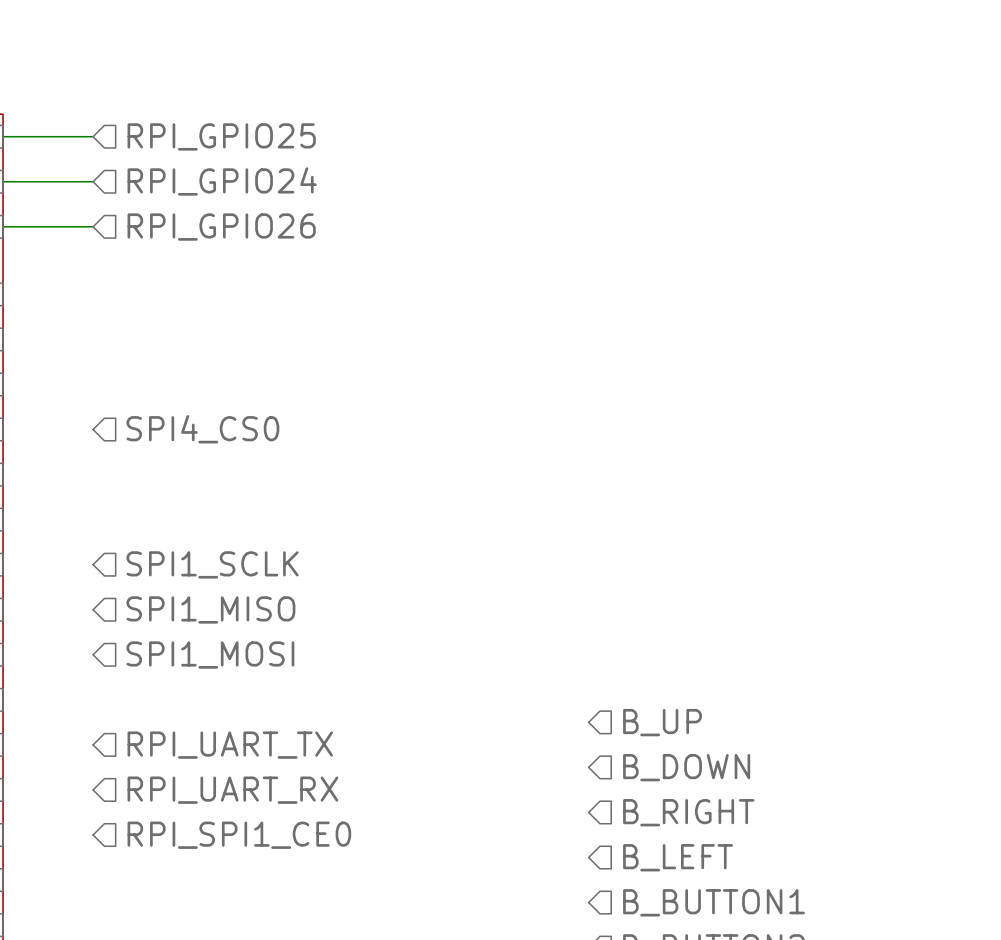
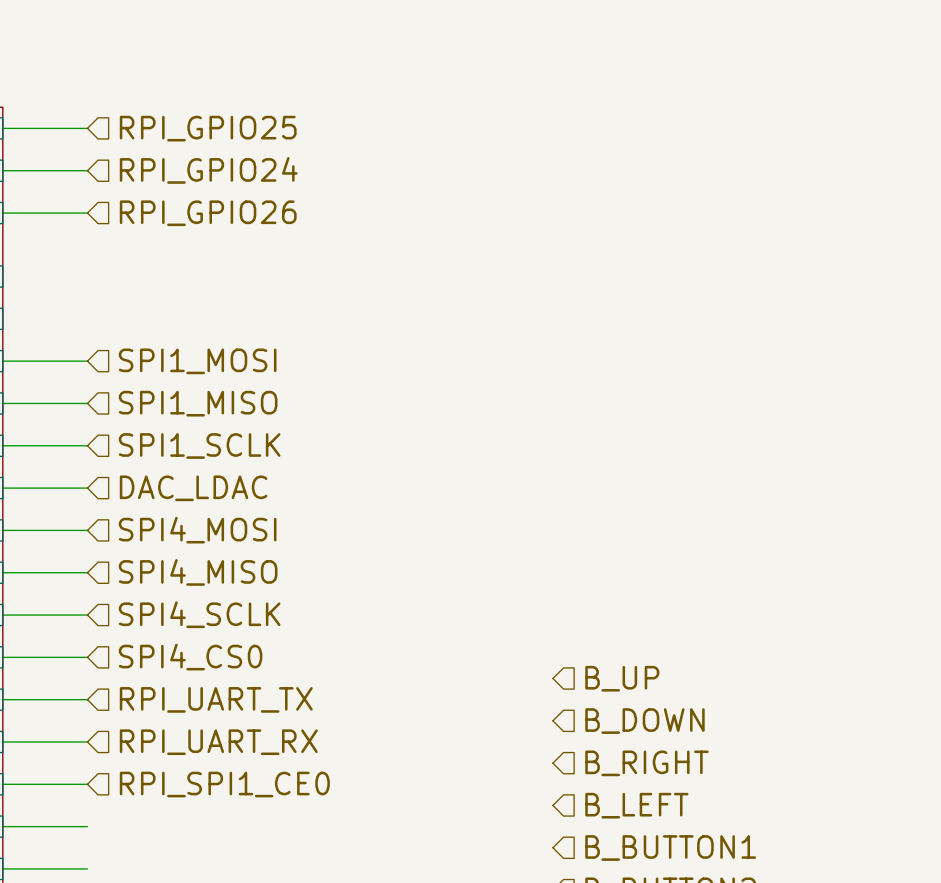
wire: none -> (2, 361) (87, 361)
hierarchical label: none -> SPI1_MOSI (197, 361)
wire: none -> (2, 403) (87, 403)
hierarchical label: SPI4_CS0 (202, 429) -> SPI1_MISO (198, 403)
wire: none -> (2, 445) (87, 445)
hierarchical label: none -> SPI1_SCLK (199, 445)
wire: none -> (2, 488) (87, 488)
hierarchical label: none -> DAC_LDAC (193, 488)
wire: none -> (2, 530) (87, 530)
hierarchical label: SPI1_SCLK (212, 564) -> SPI4_MOSI (197, 530)
wire: none -> (2, 572) (87, 572)
hierarchical label: SPI1_MISO (210, 609) -> SPI4_MISO (198, 572)
wire: none -> (2, 615) (87, 615)
hierarchical label: SPI1_MOSI (210, 655) -> SPI4_SCLK (199, 614)
wire: none -> (2, 657) (87, 657)
hierarchical label: none -> SPI4_CS0 (190, 657)
wire: none -> (2, 699) (87, 699)
wire: none -> (2, 741) (87, 741)
wire: none -> (2, 784) (87, 784)
wire: none -> (2, 826) (87, 826)
wire: none -> (2, 868) (87, 868)

